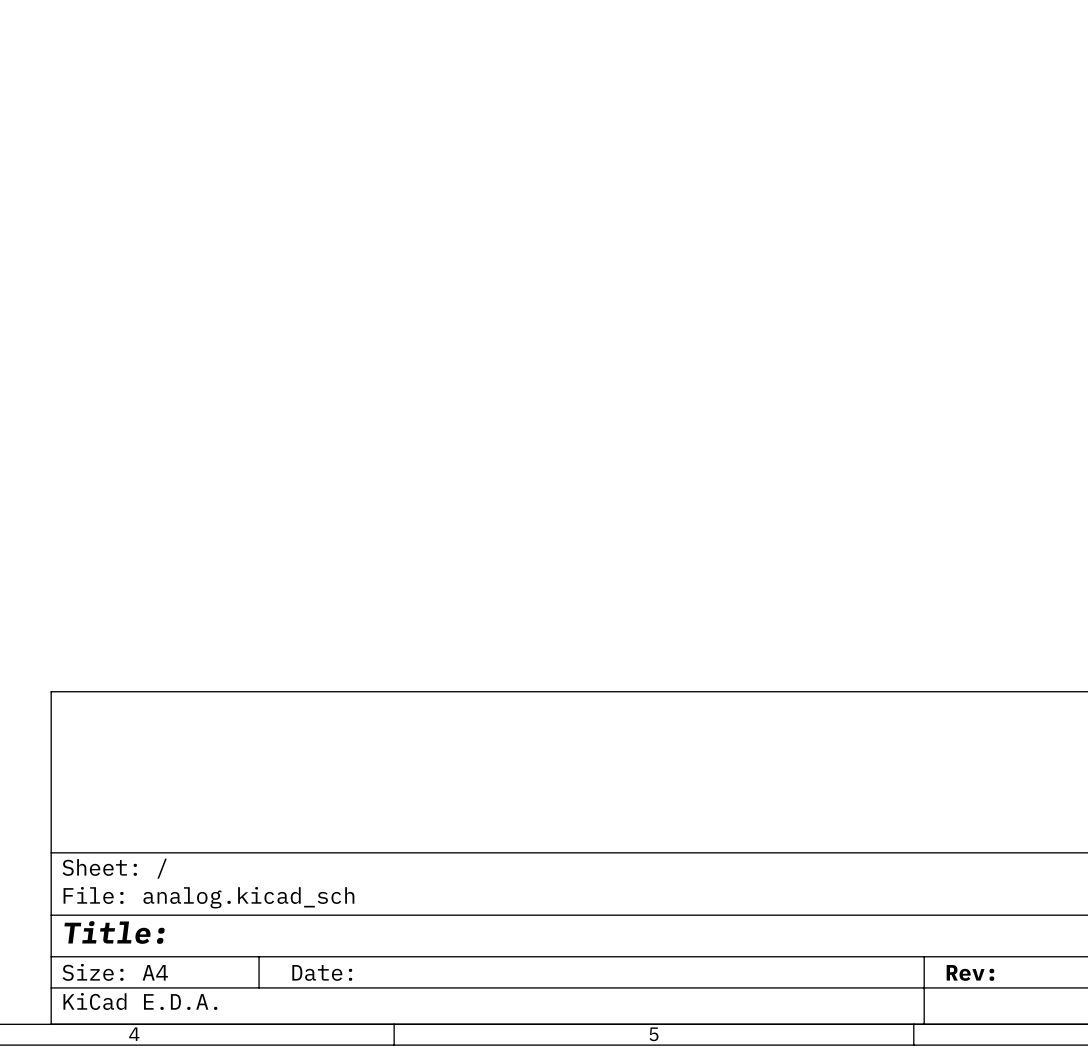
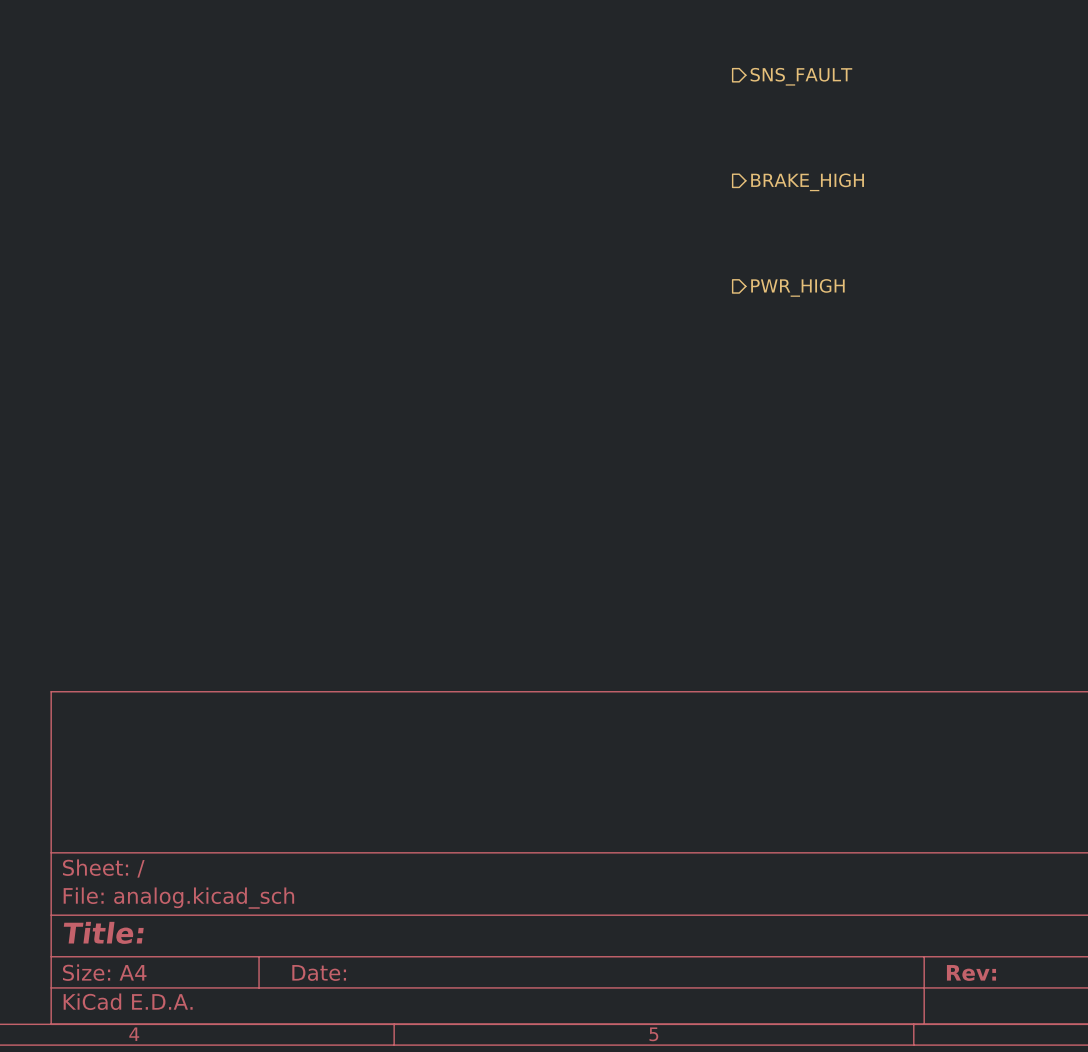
hierarchical label: none -> SNS_FAULT (801, 76)
hierarchical label: none -> BRAKE_HIGH (807, 182)
hierarchical label: none -> PWR_HIGH (797, 287)

